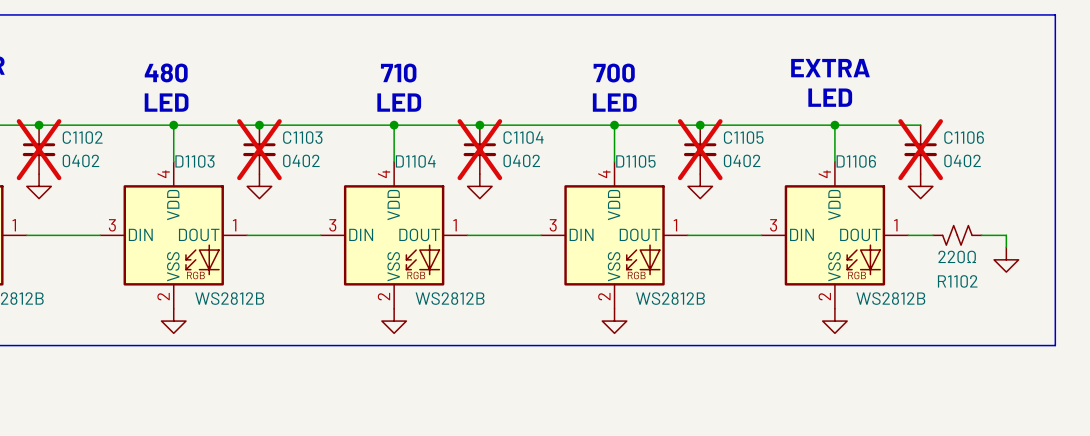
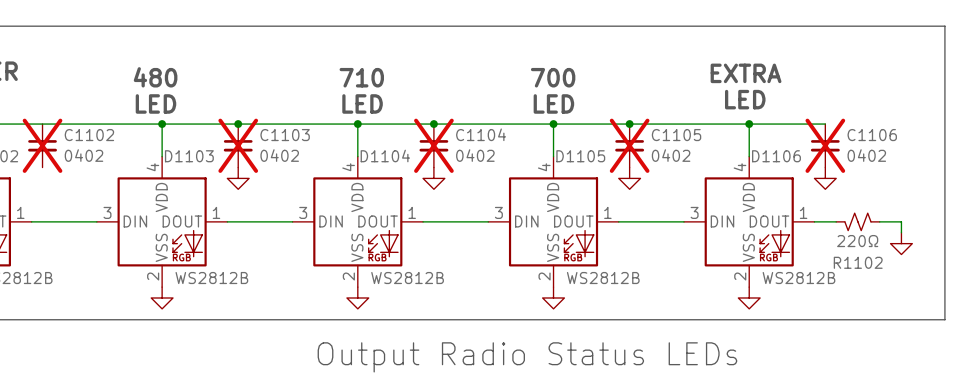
junction: (39, 125) -> none
power symbol: (39, 186) -> none
text: none -> Output Radio Status LEDs (527, 357)

